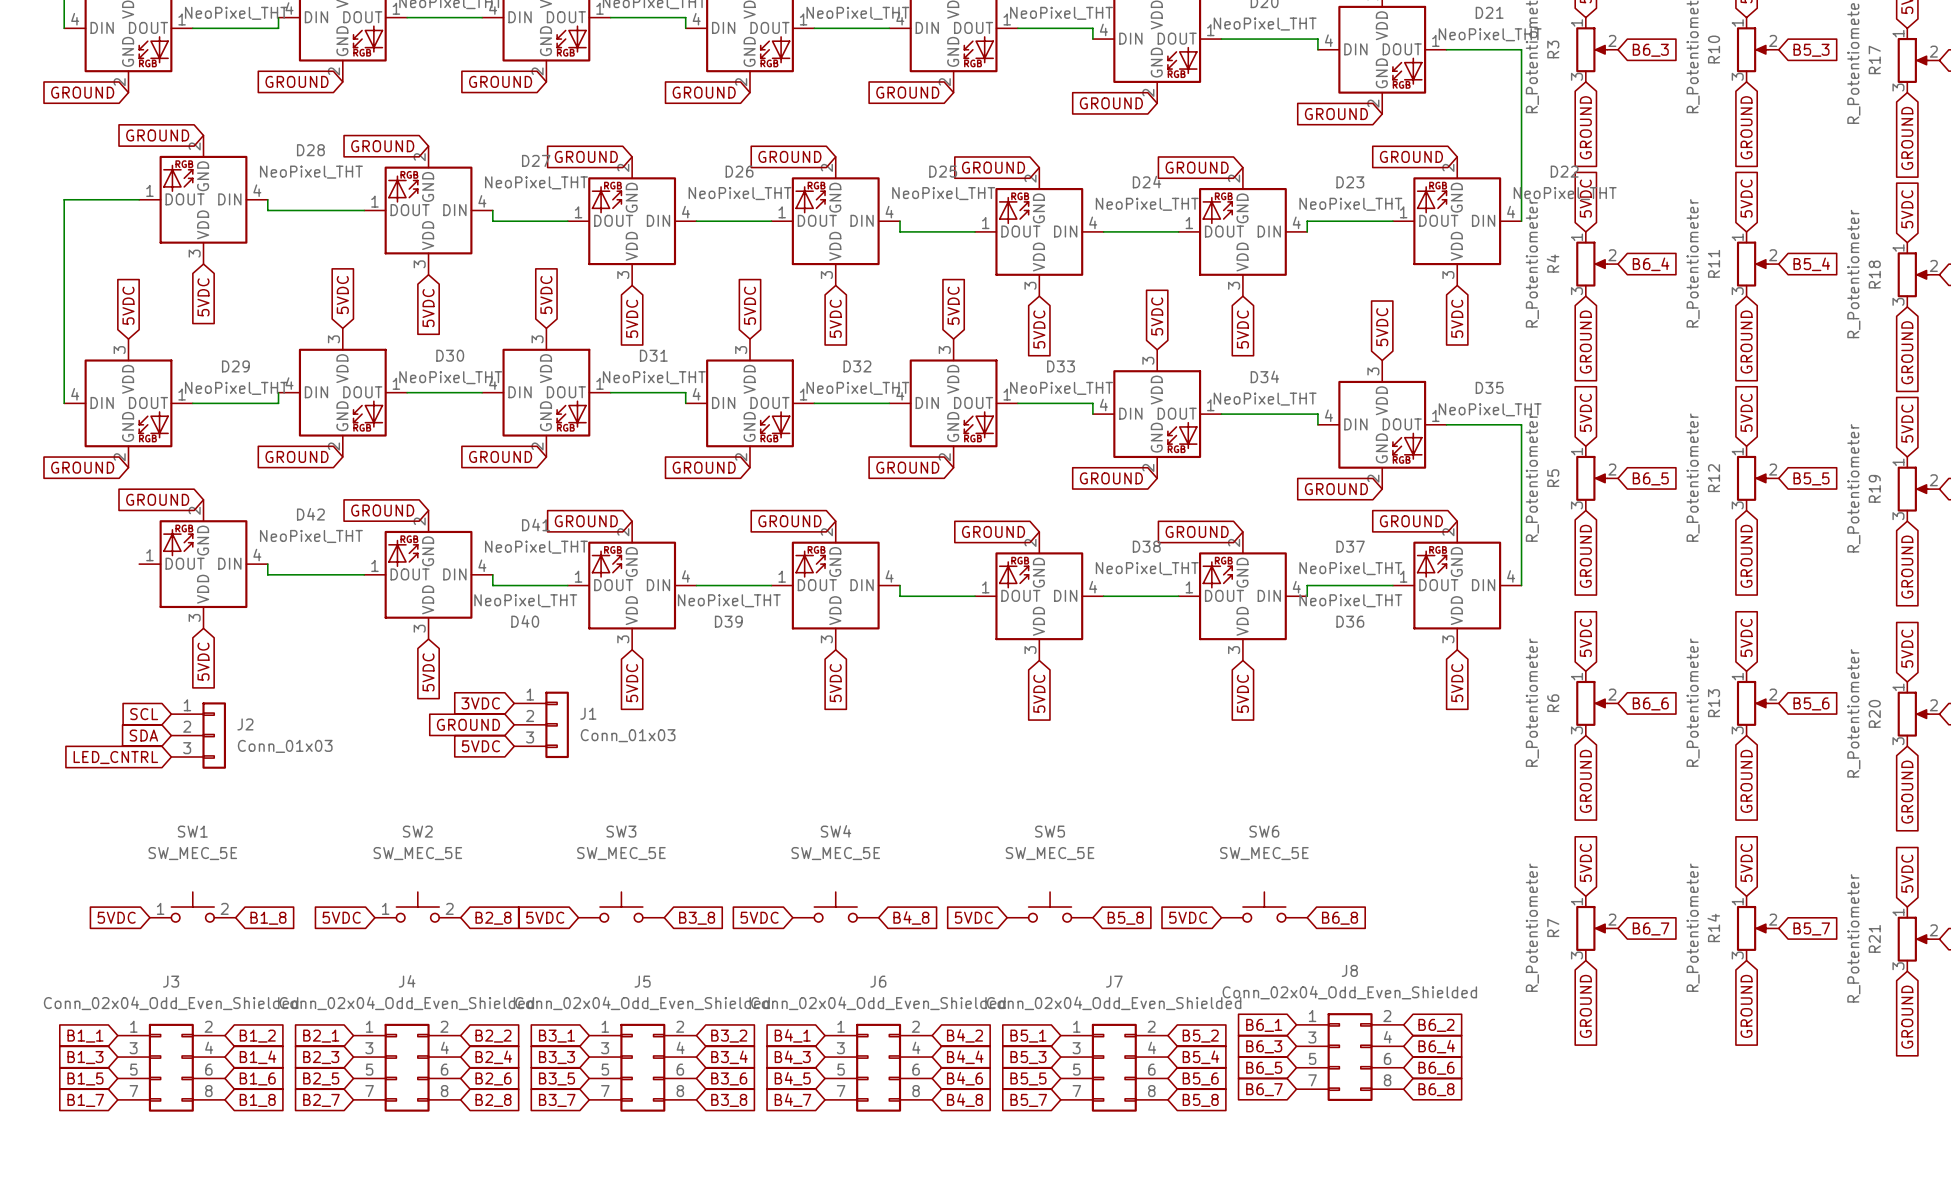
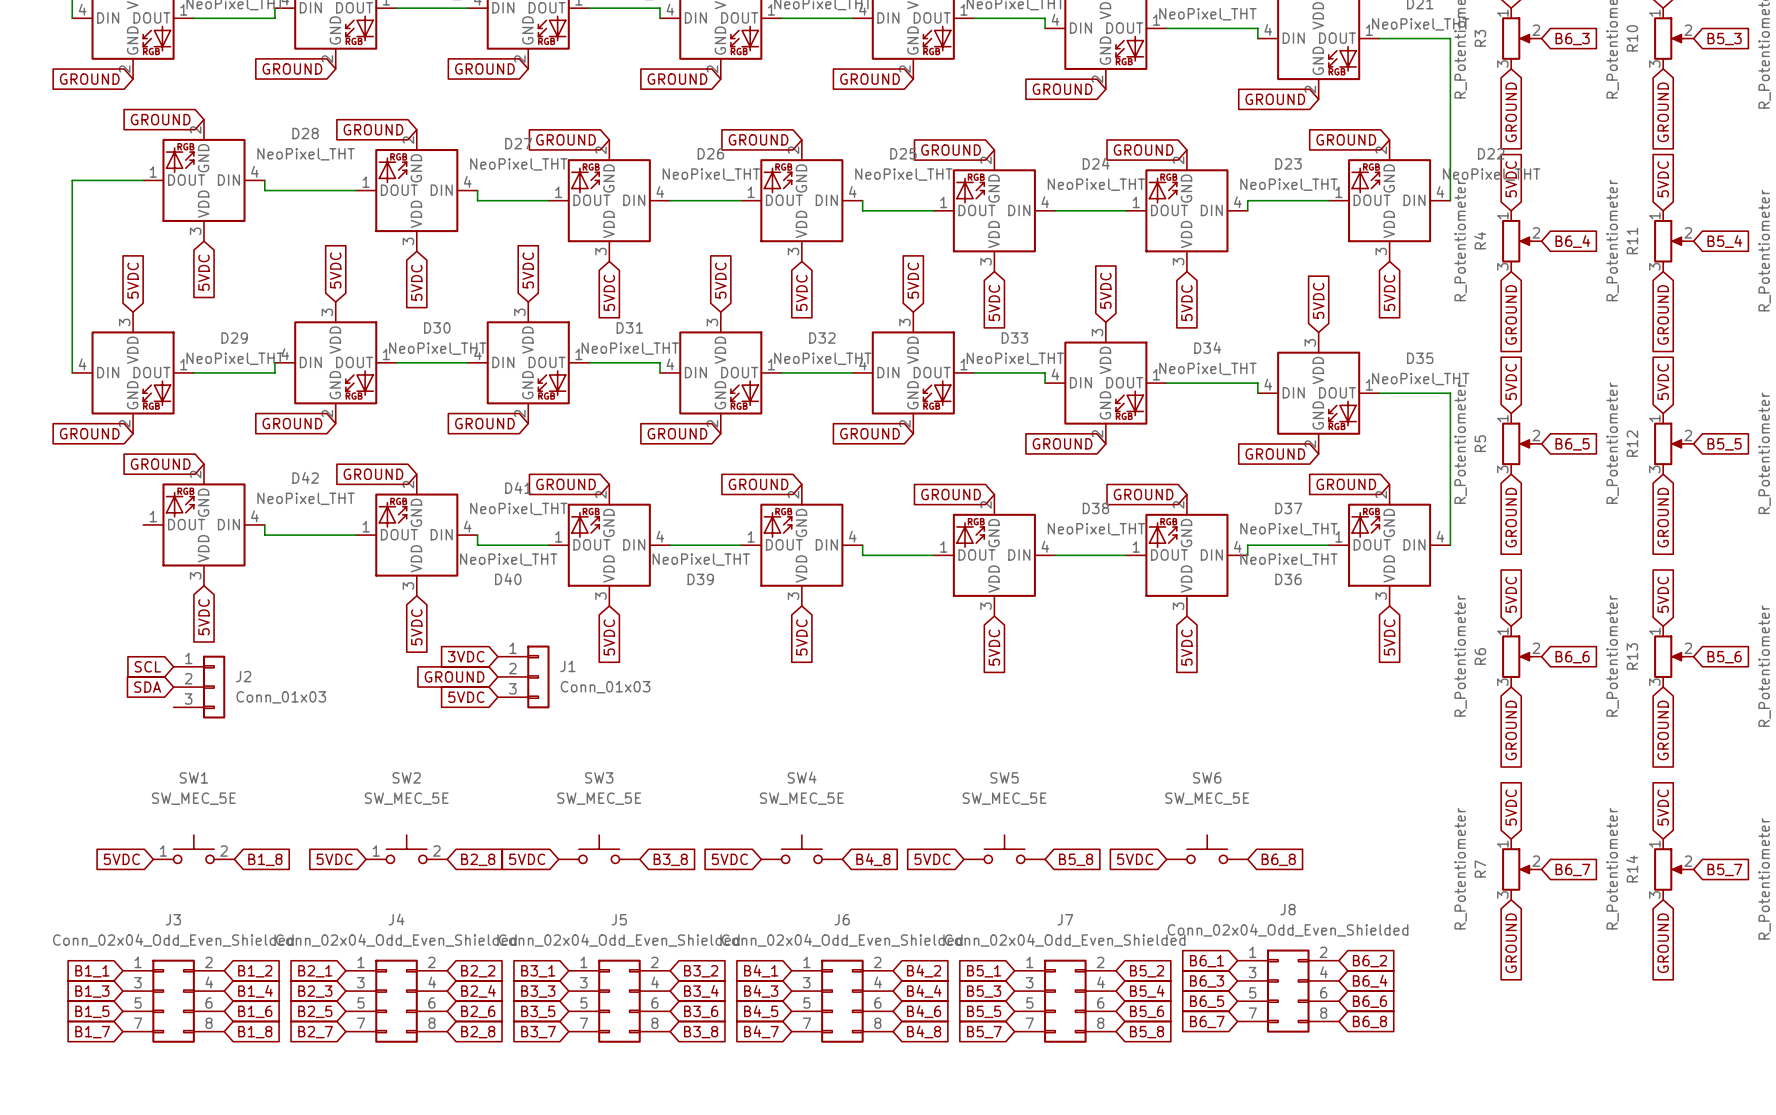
global label: LED_CNTRL (115, 757) -> none

